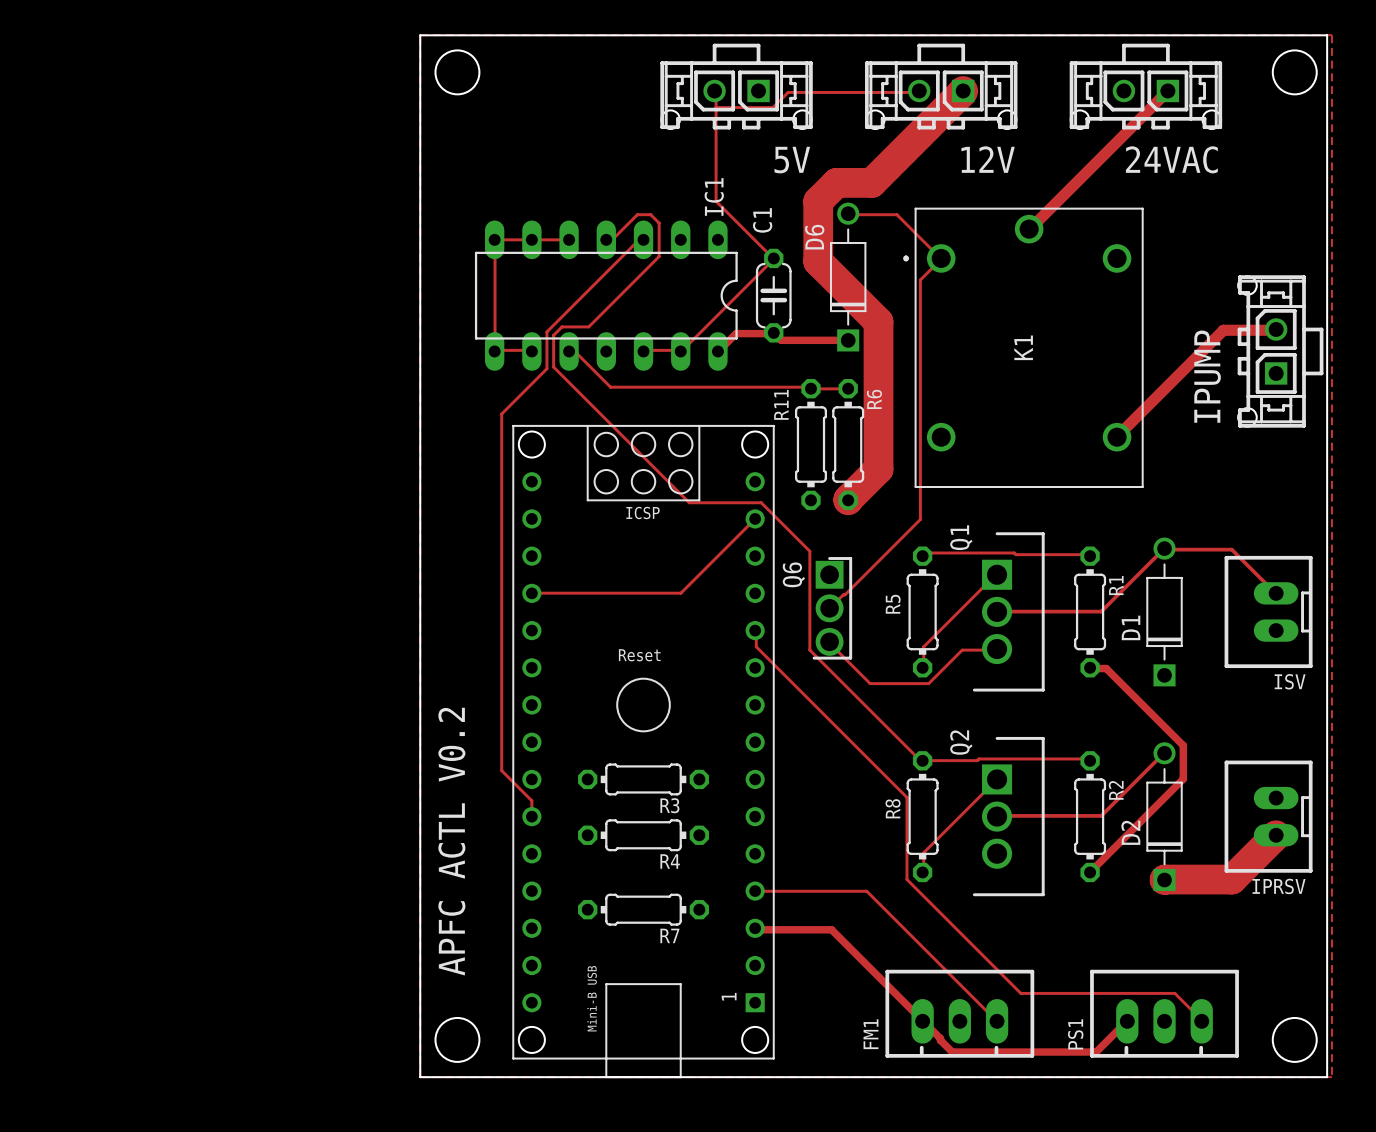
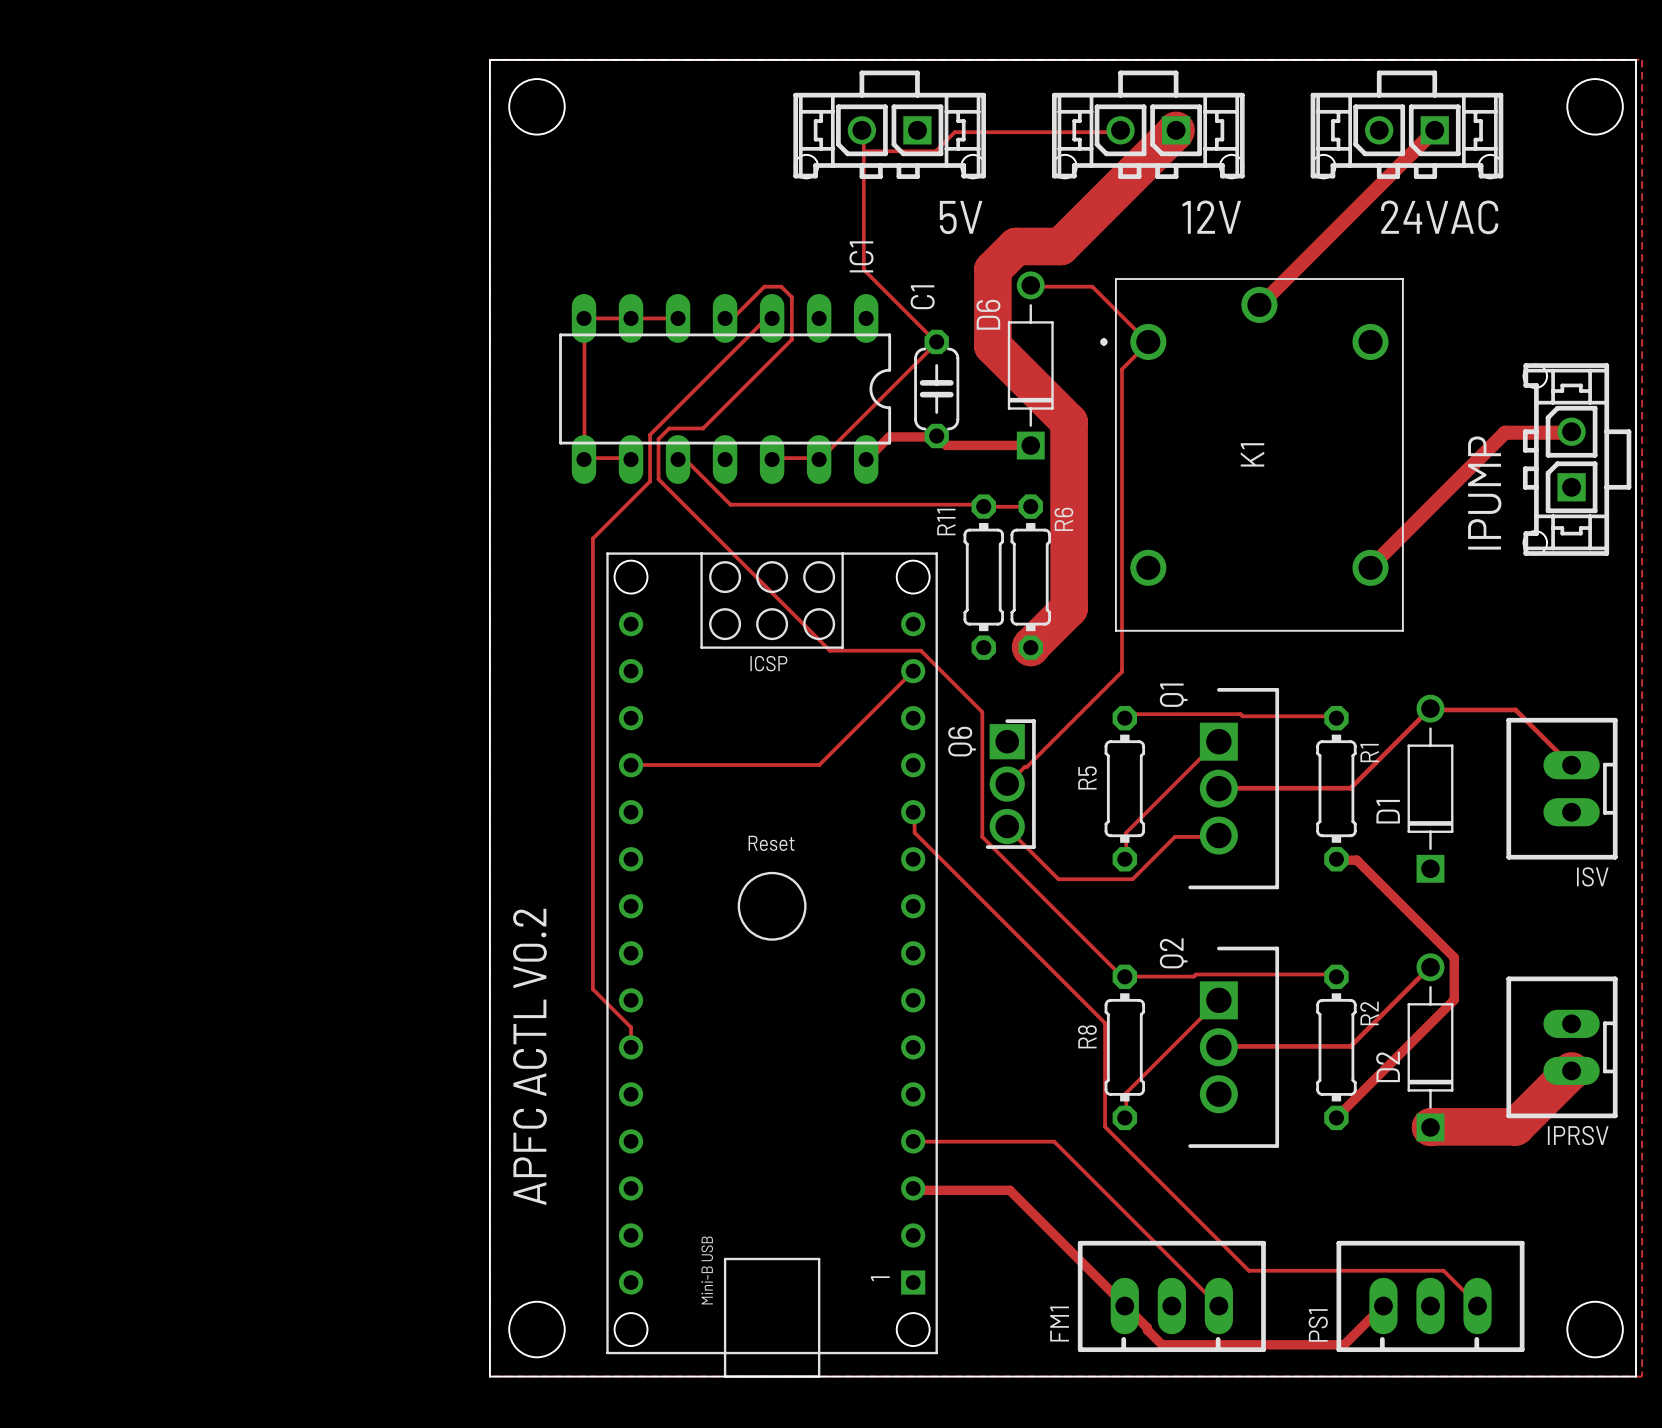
R3: (643, 779) -> none
R4: (643, 835) -> none
R7: (643, 909) -> none

